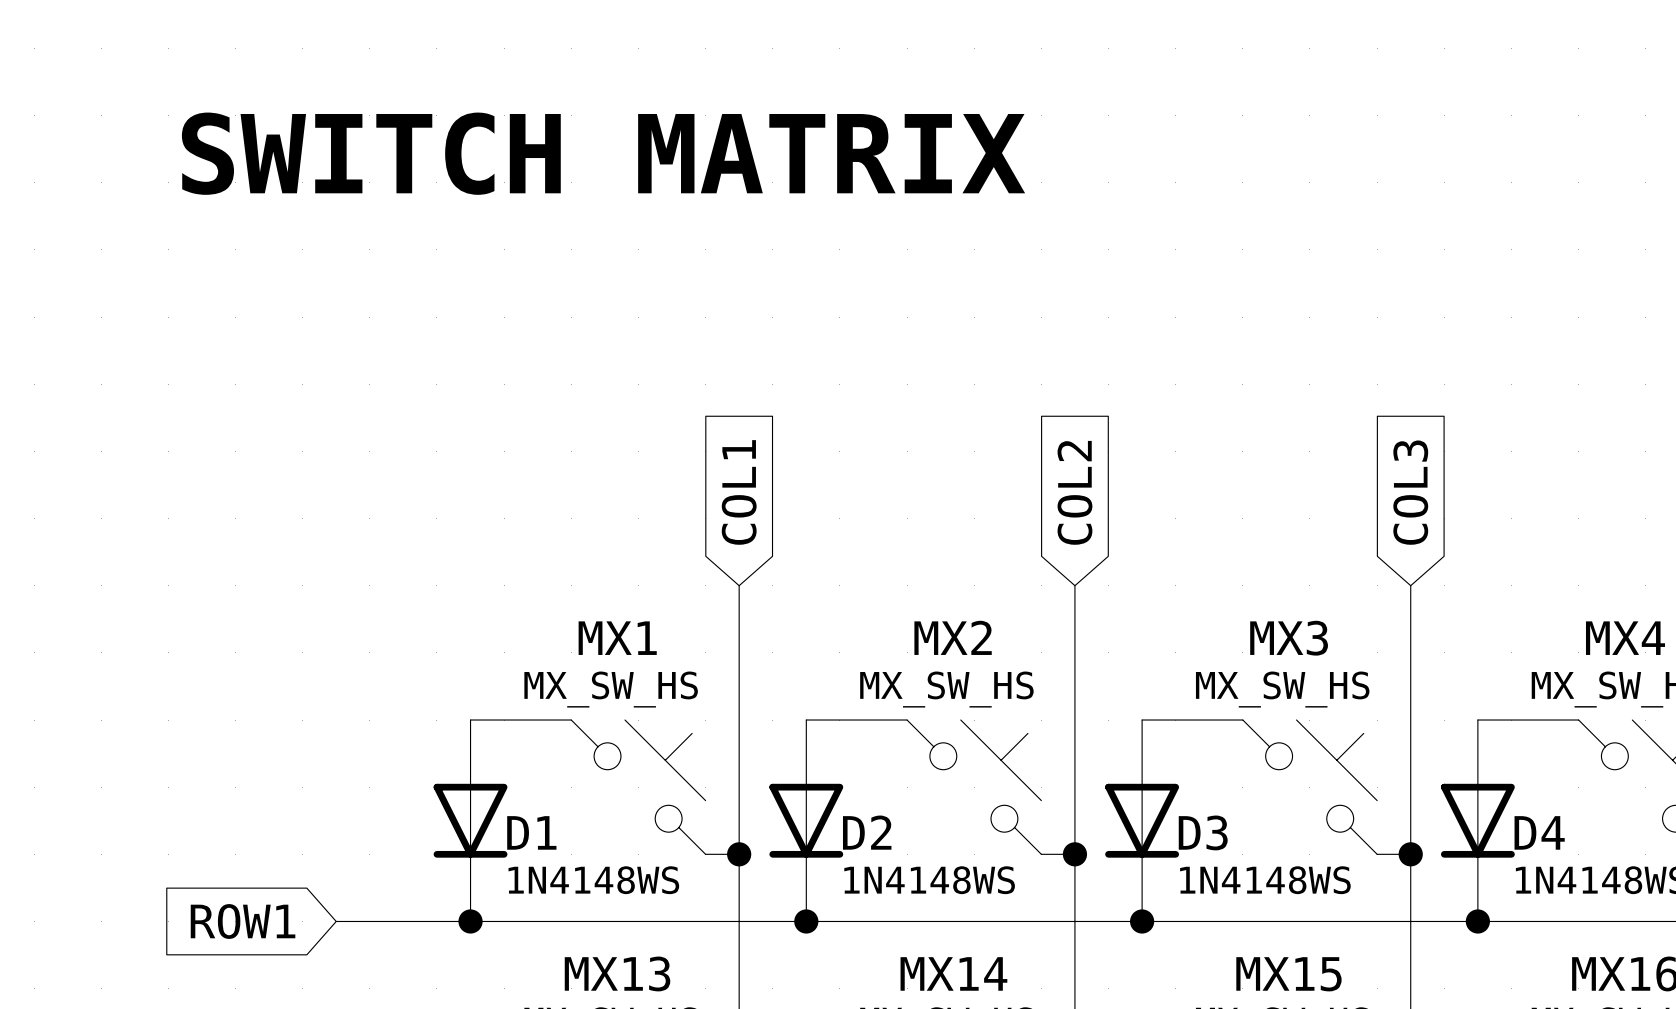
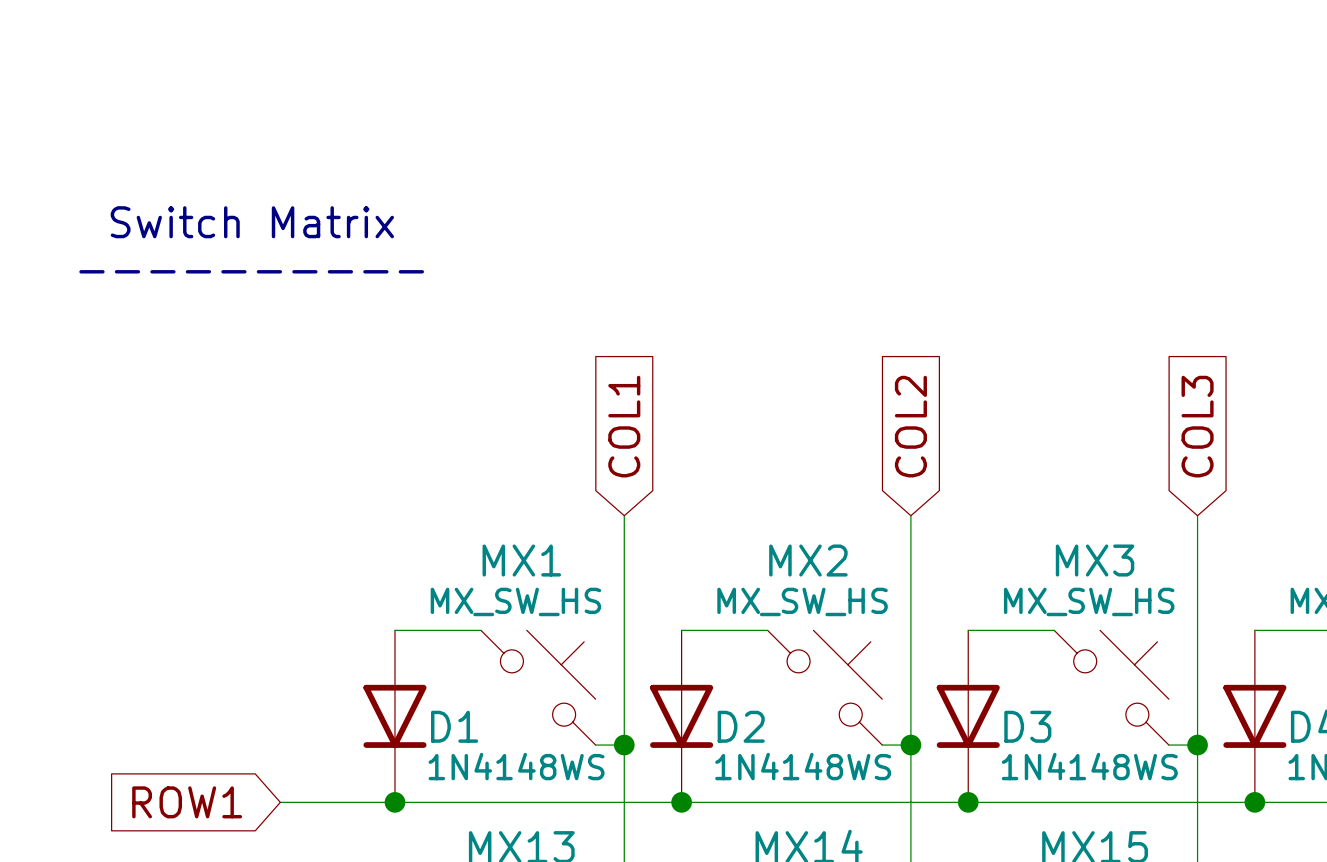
text: SWITCH MATRIX (603, 153) -> none
text: none -> Switch Matrix (252, 222)
text: none -> ---------- (251, 271)

